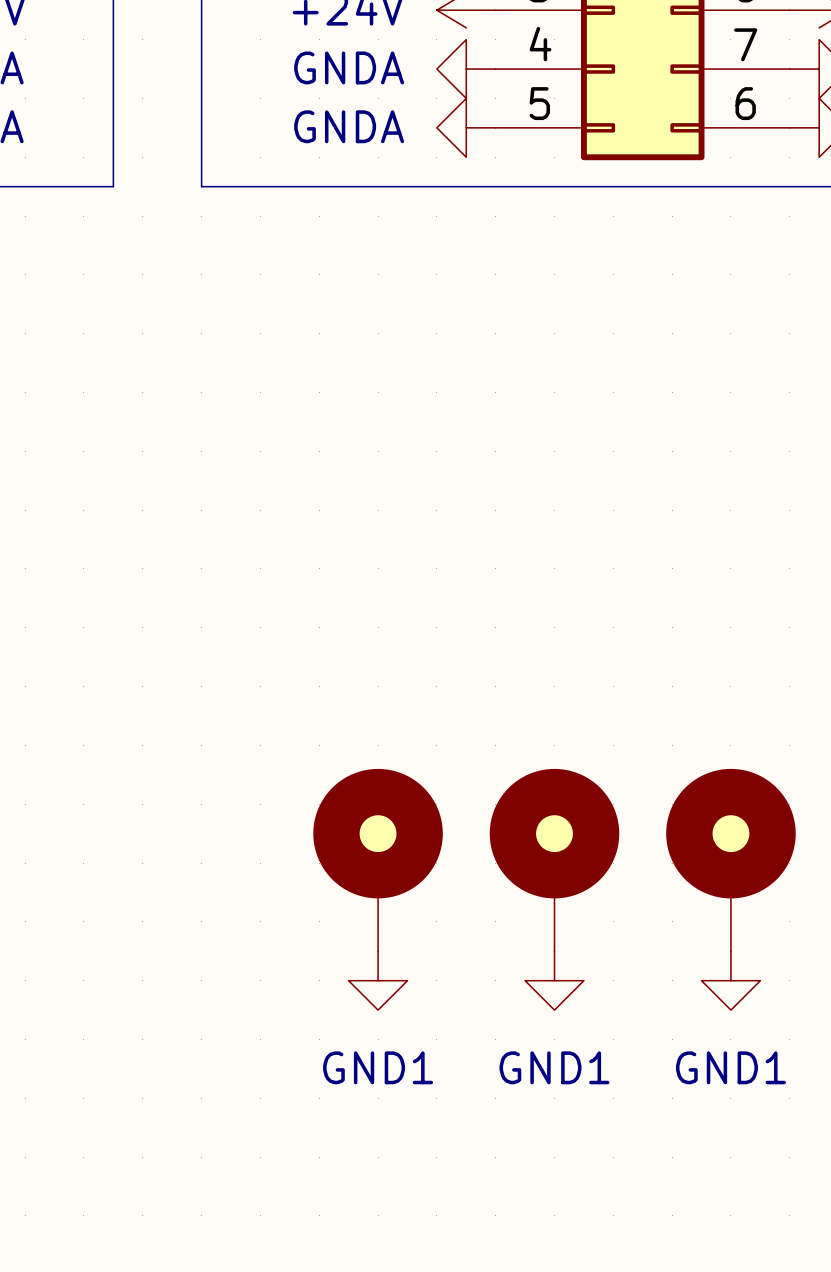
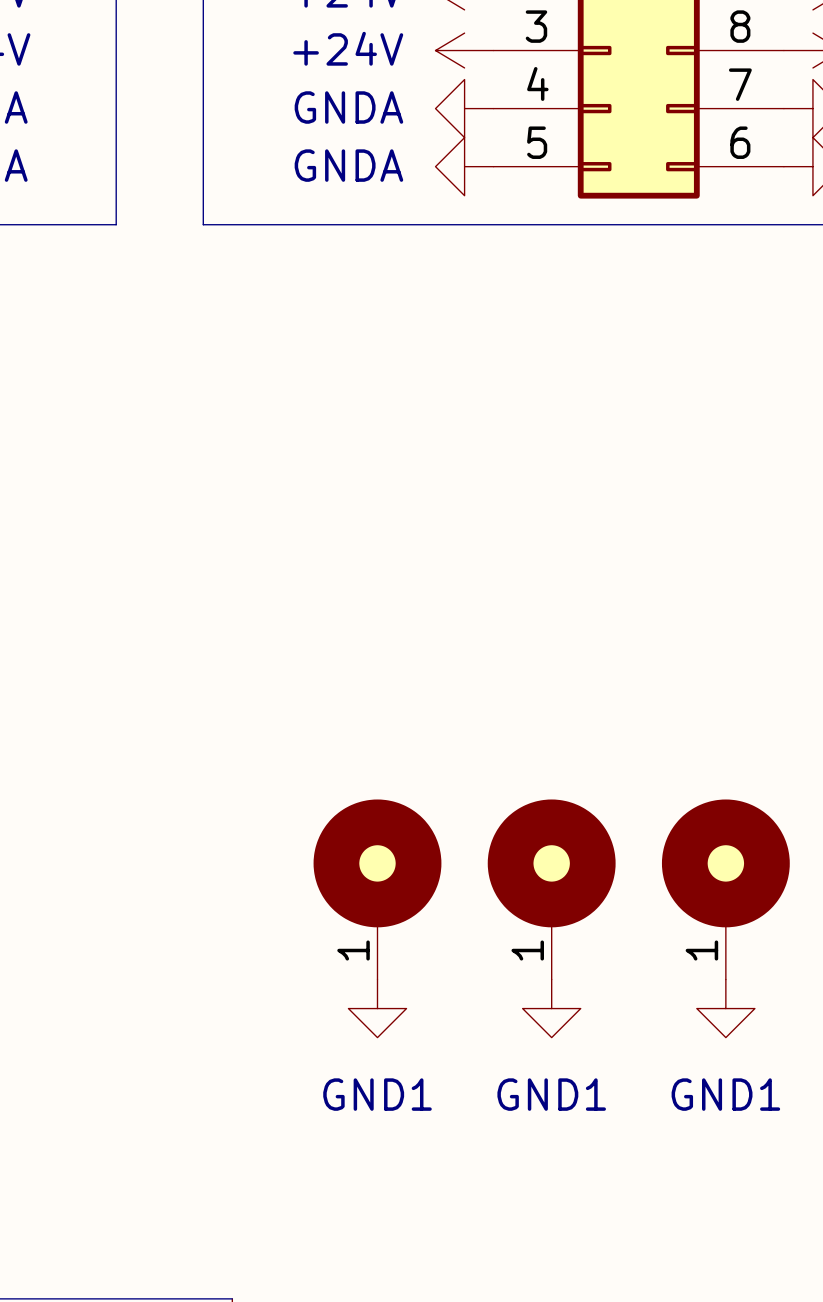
part pin number: none -> 1 (353, 950)
part pin number: none -> 1 (527, 950)
part pin number: none -> 1 (701, 950)

